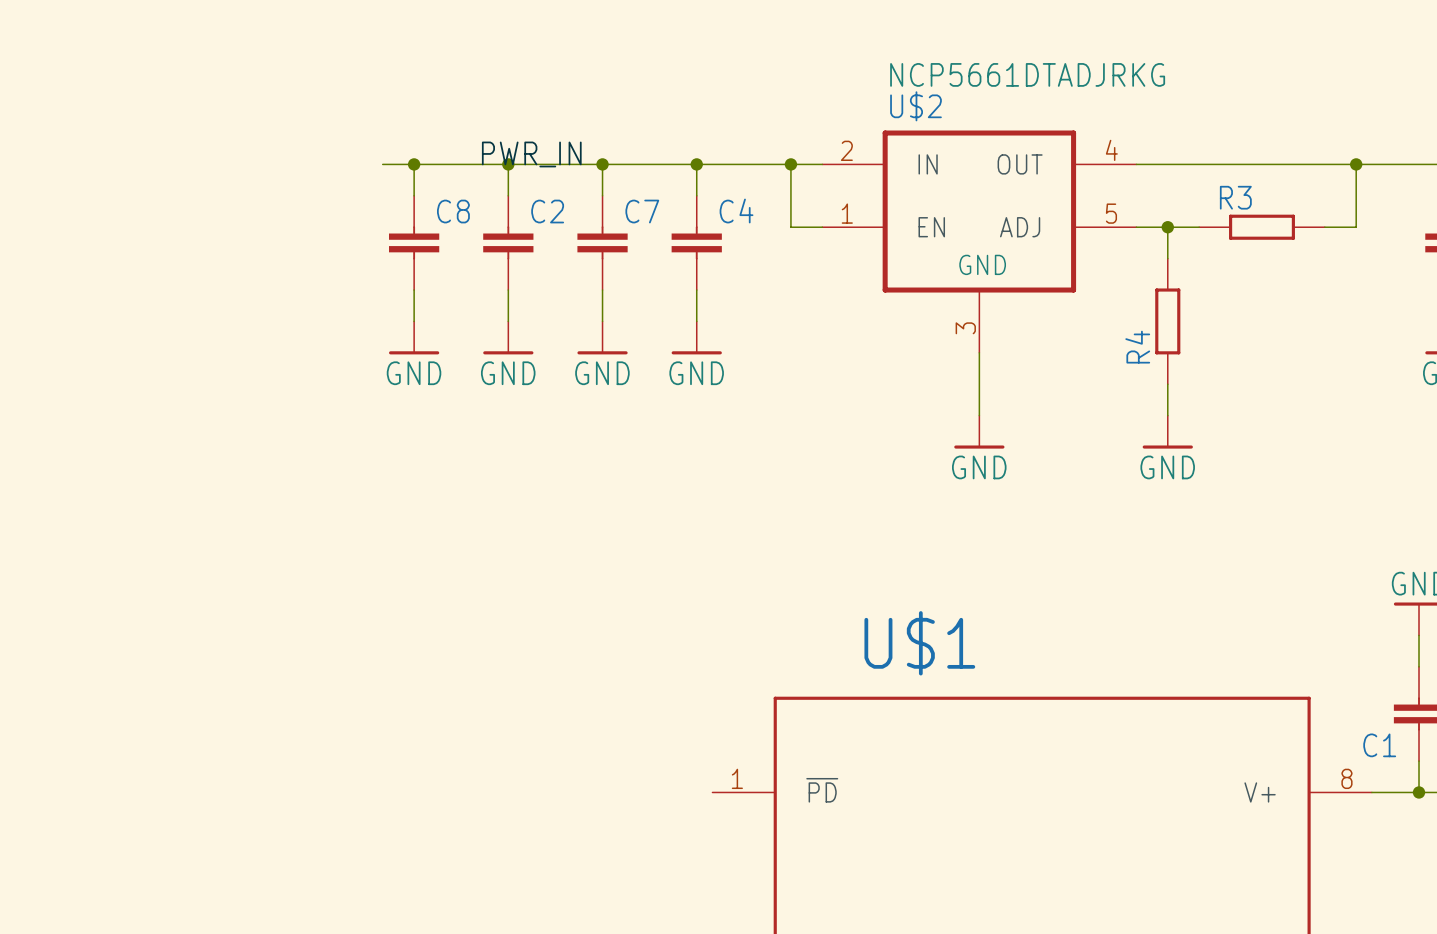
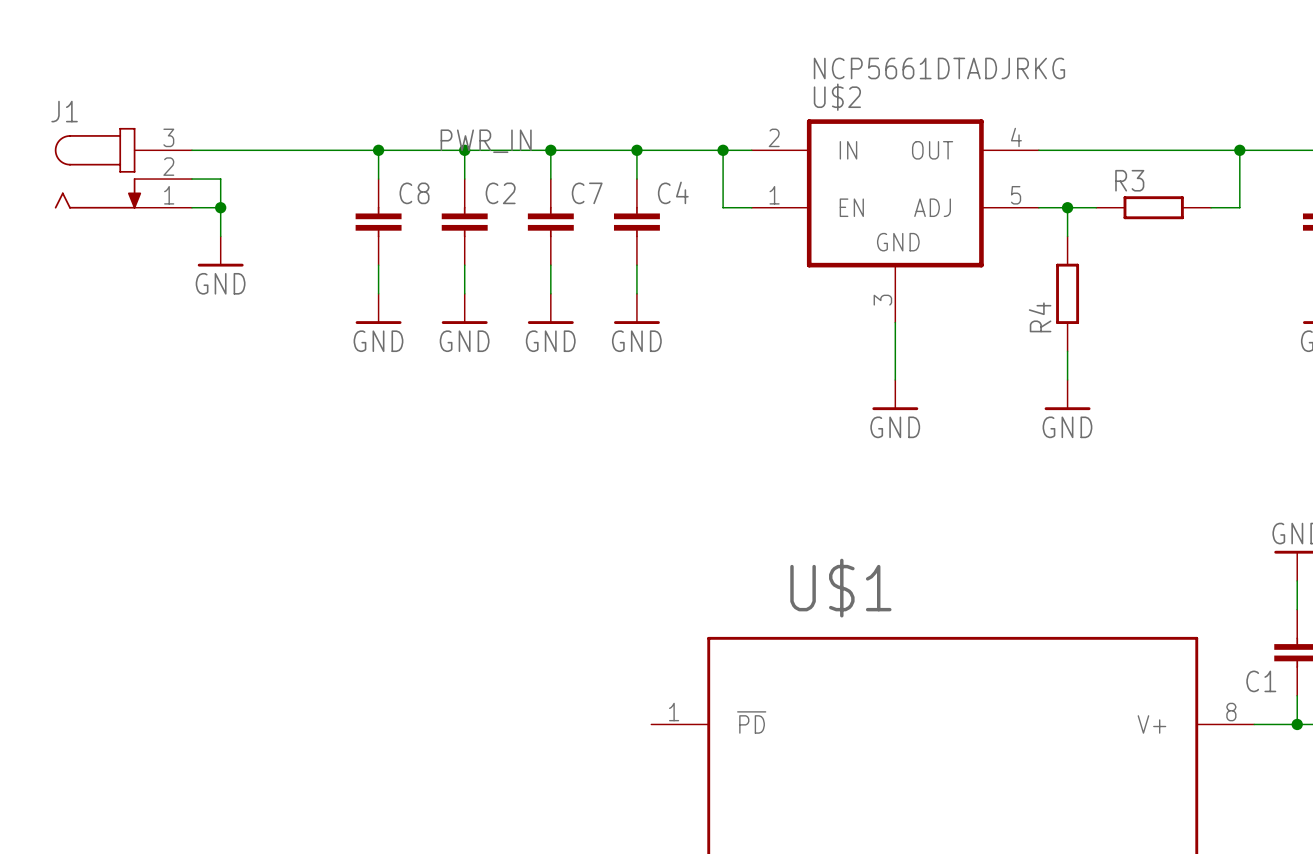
wire: none -> (191, 150) (349, 150)
J1: none -> (123, 168)
wire: none -> (191, 179) (220, 179) (220, 236)
wire: none -> (191, 207) (220, 207)
junction: none -> (220, 207)
power symbol: none -> GND (220, 251)

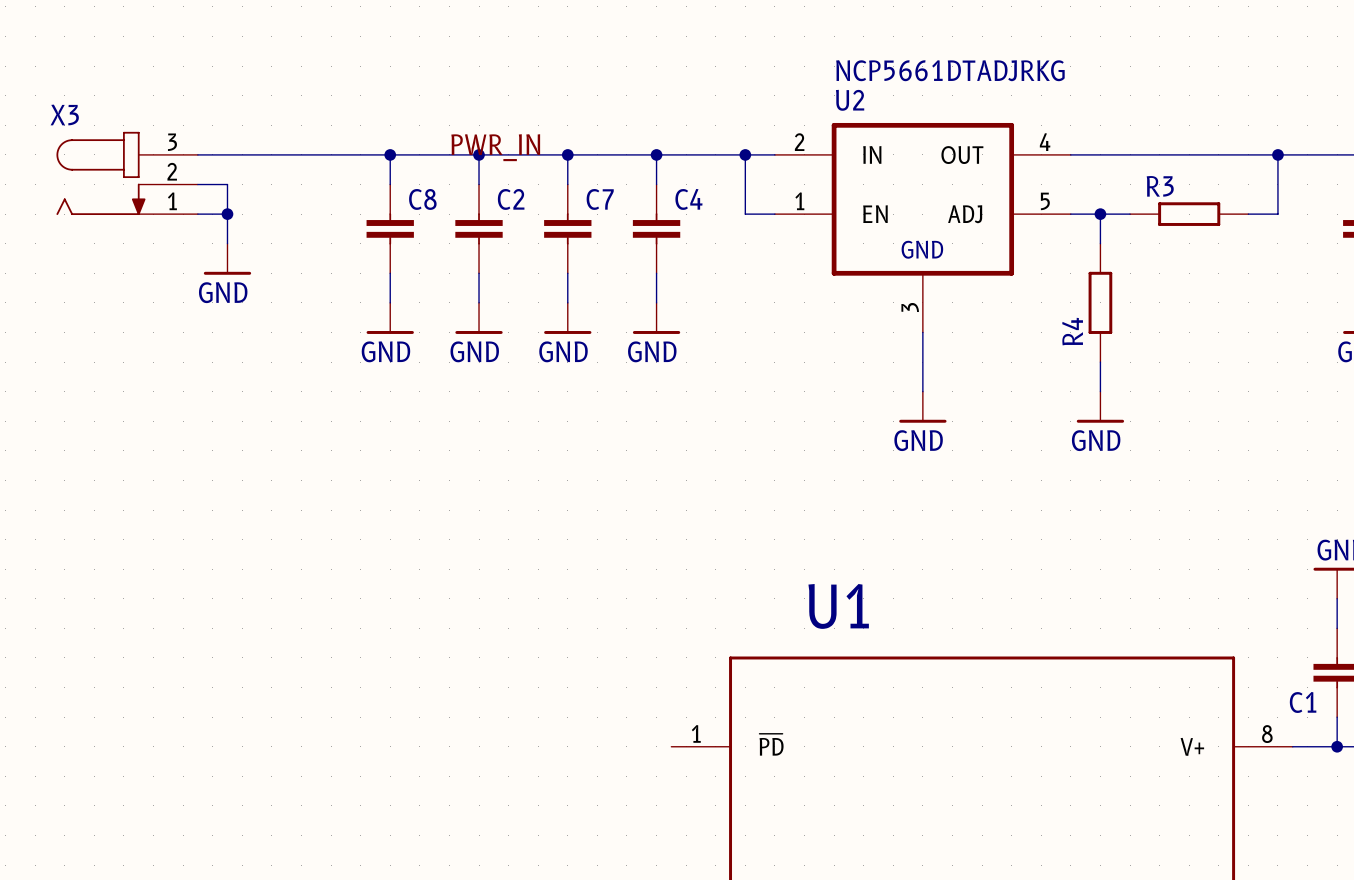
U$2 name: U$2 (837, 97) -> U2 (850, 100)
J1 name: J1 (64, 111) -> X3 (64, 114)
U$1 name: U$1 (840, 588) -> U1 (838, 606)

